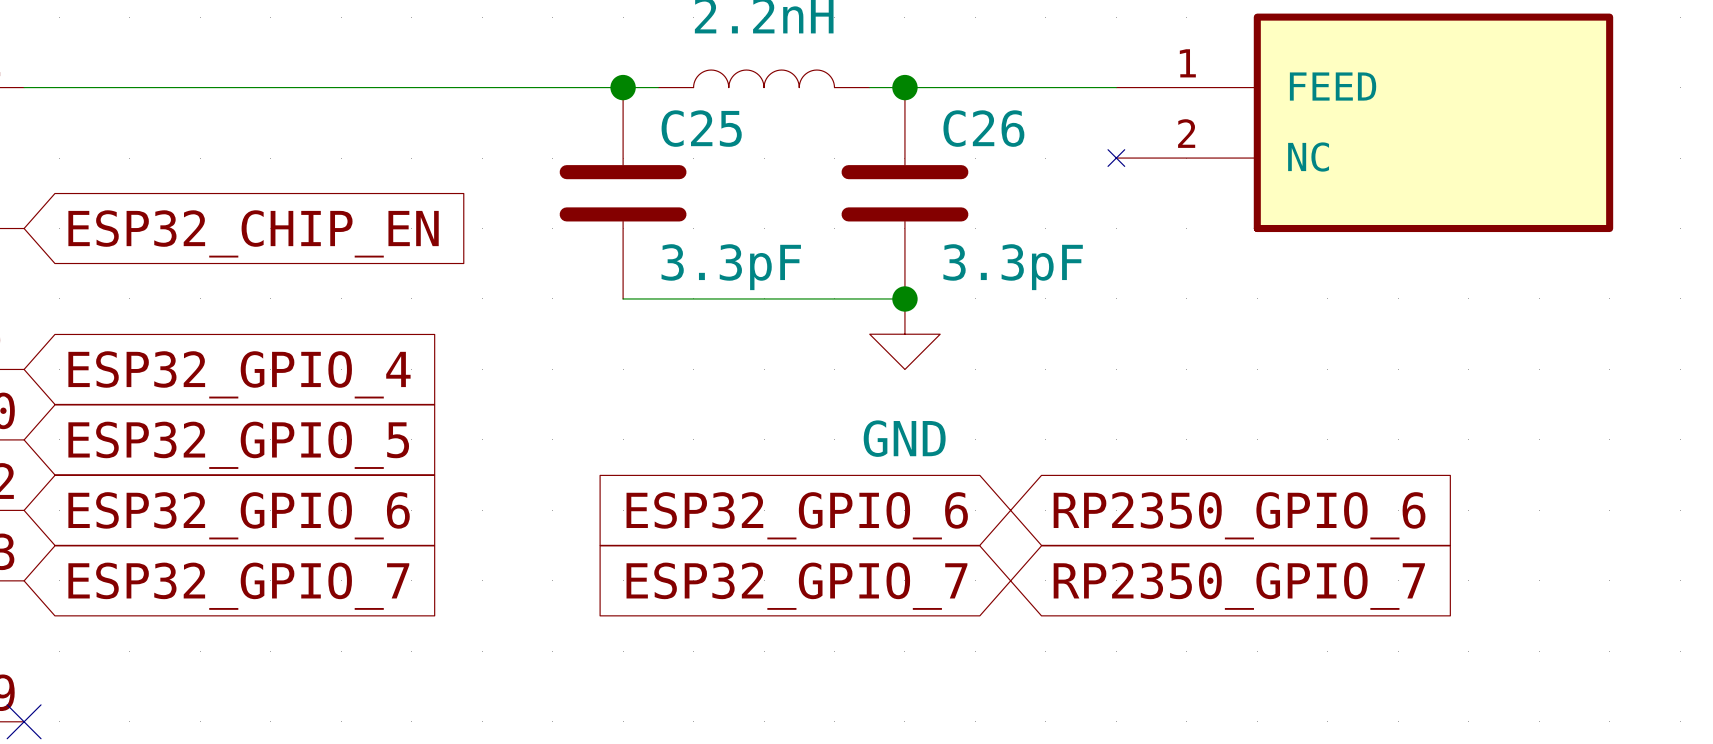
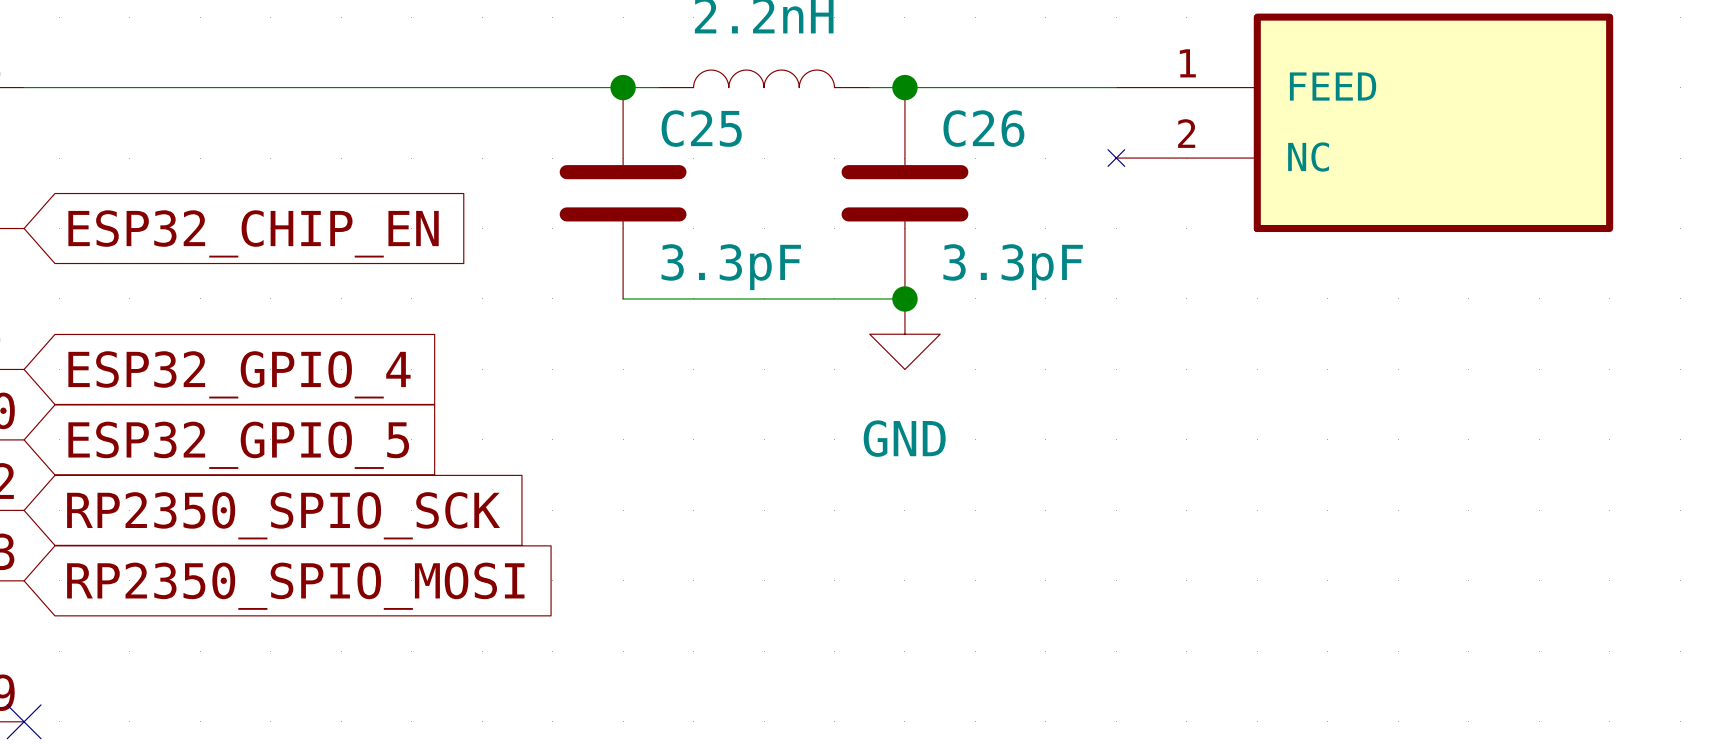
global label: ESP32_GPIO_6 (239, 515) -> RP2350_SPIO_SCK (283, 515)
global label: ESP32_GPIO_6 (797, 515) -> none
global label: RP2350_GPIO_6 (1239, 515) -> none
global label: ESP32_GPIO_7 (238, 586) -> RP2350_SPIO_MOSI (295, 586)
global label: ESP32_GPIO_7 (796, 586) -> none
global label: RP2350_GPIO_7 (1239, 586) -> none

